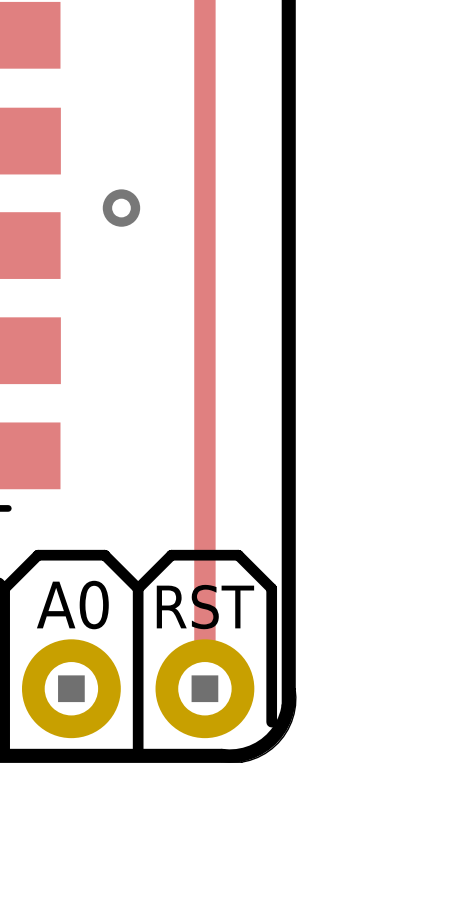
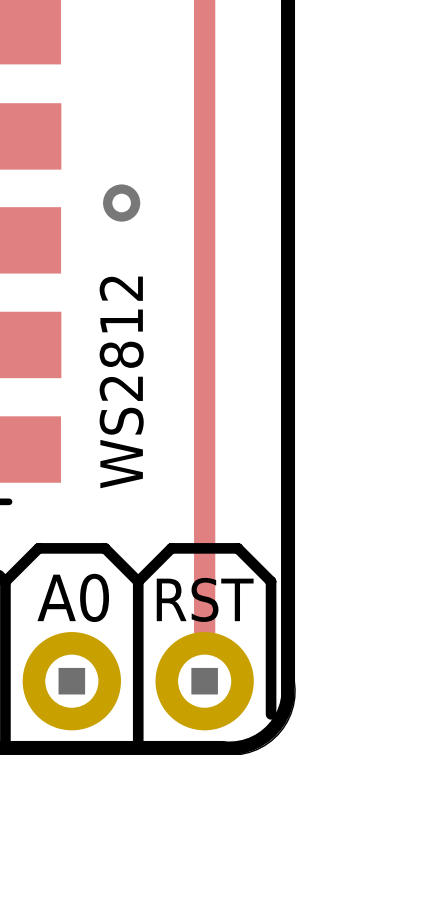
text: none -> WS2812 (121, 382)

